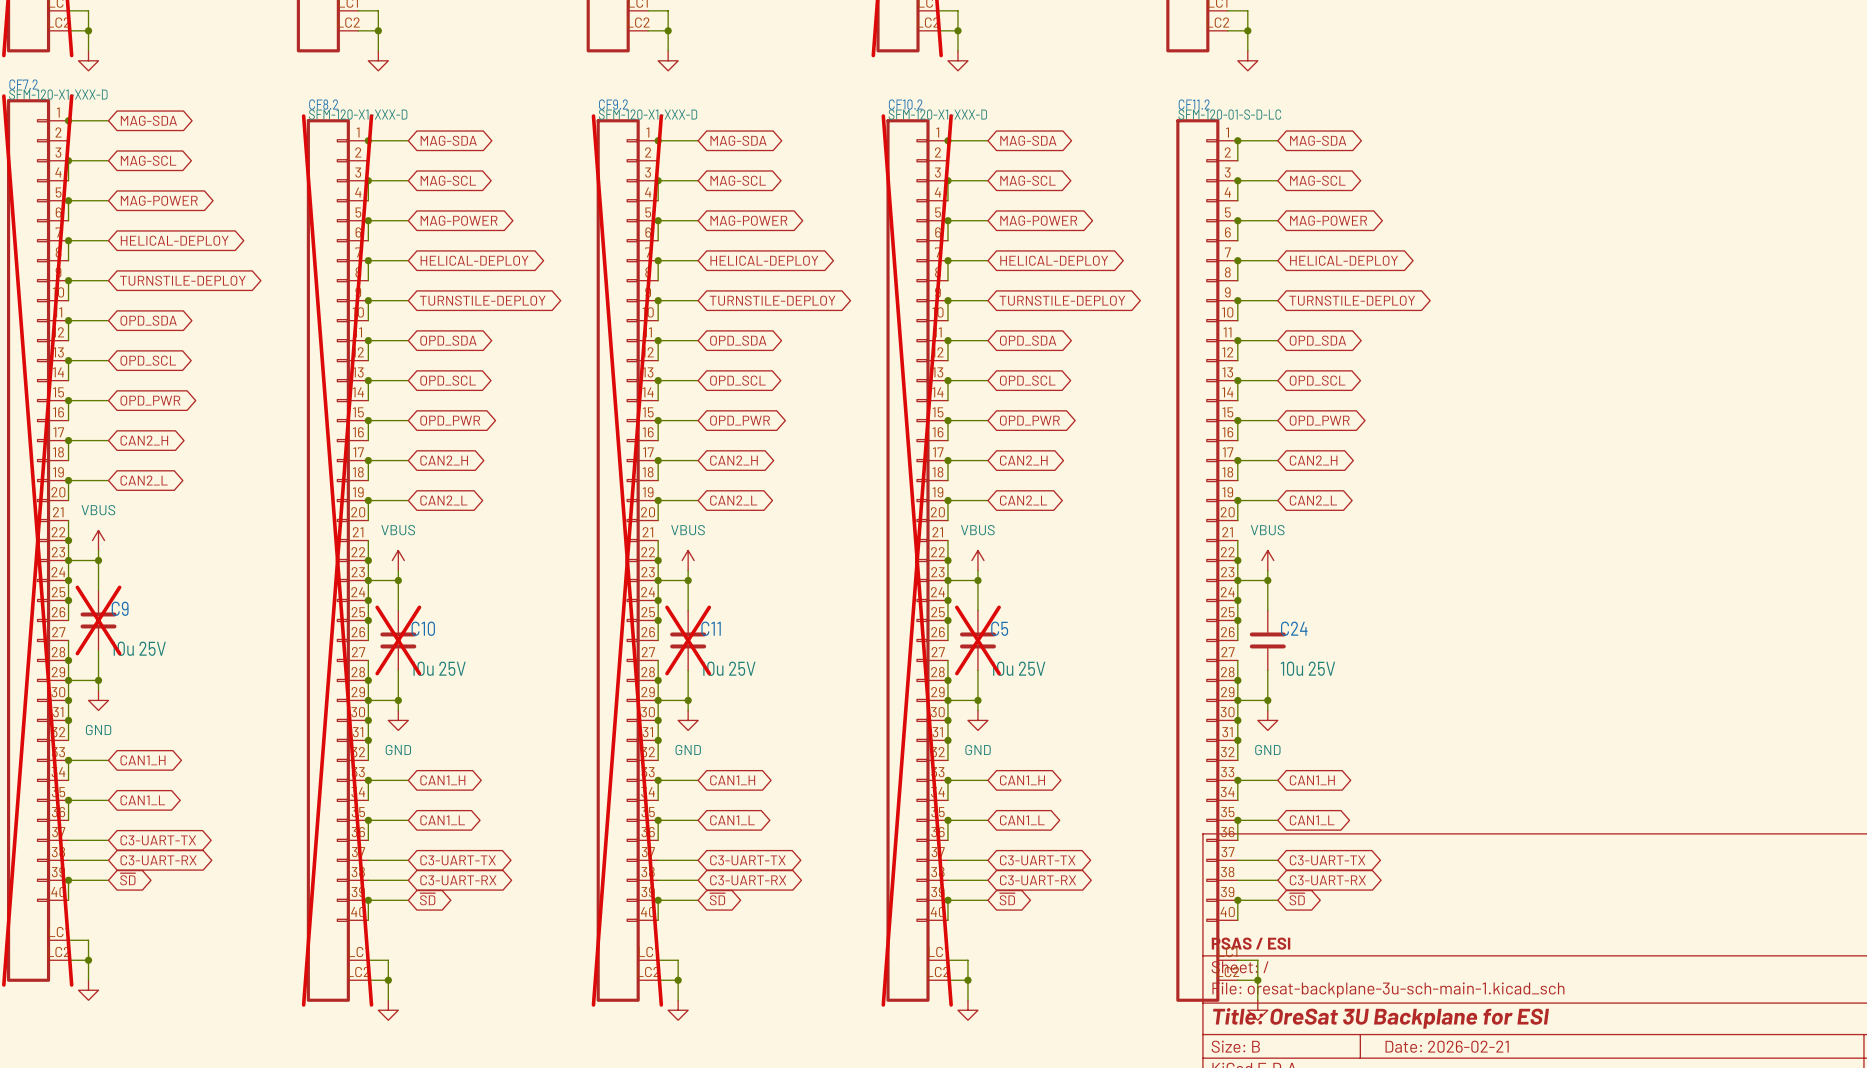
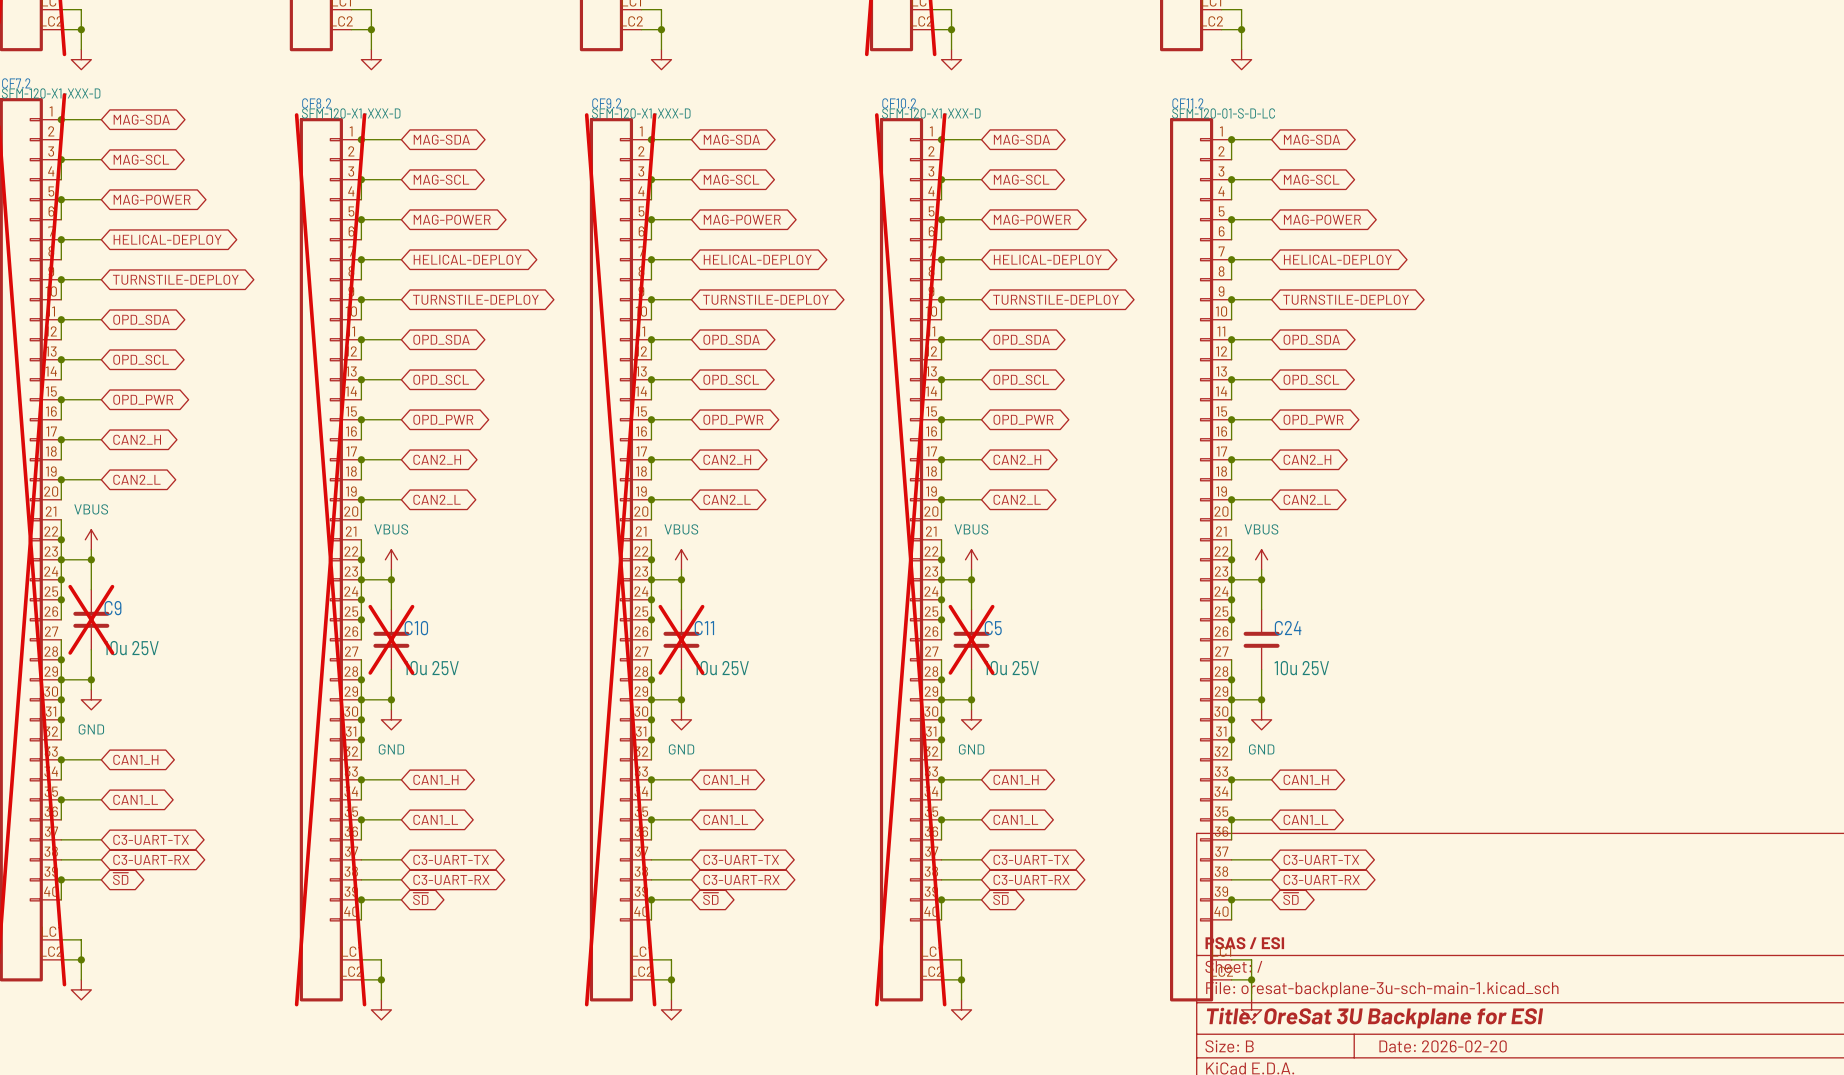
title block: Date: 2026-02-21 (1447, 1046) -> Date: 2026-02-20 (1443, 1046)

